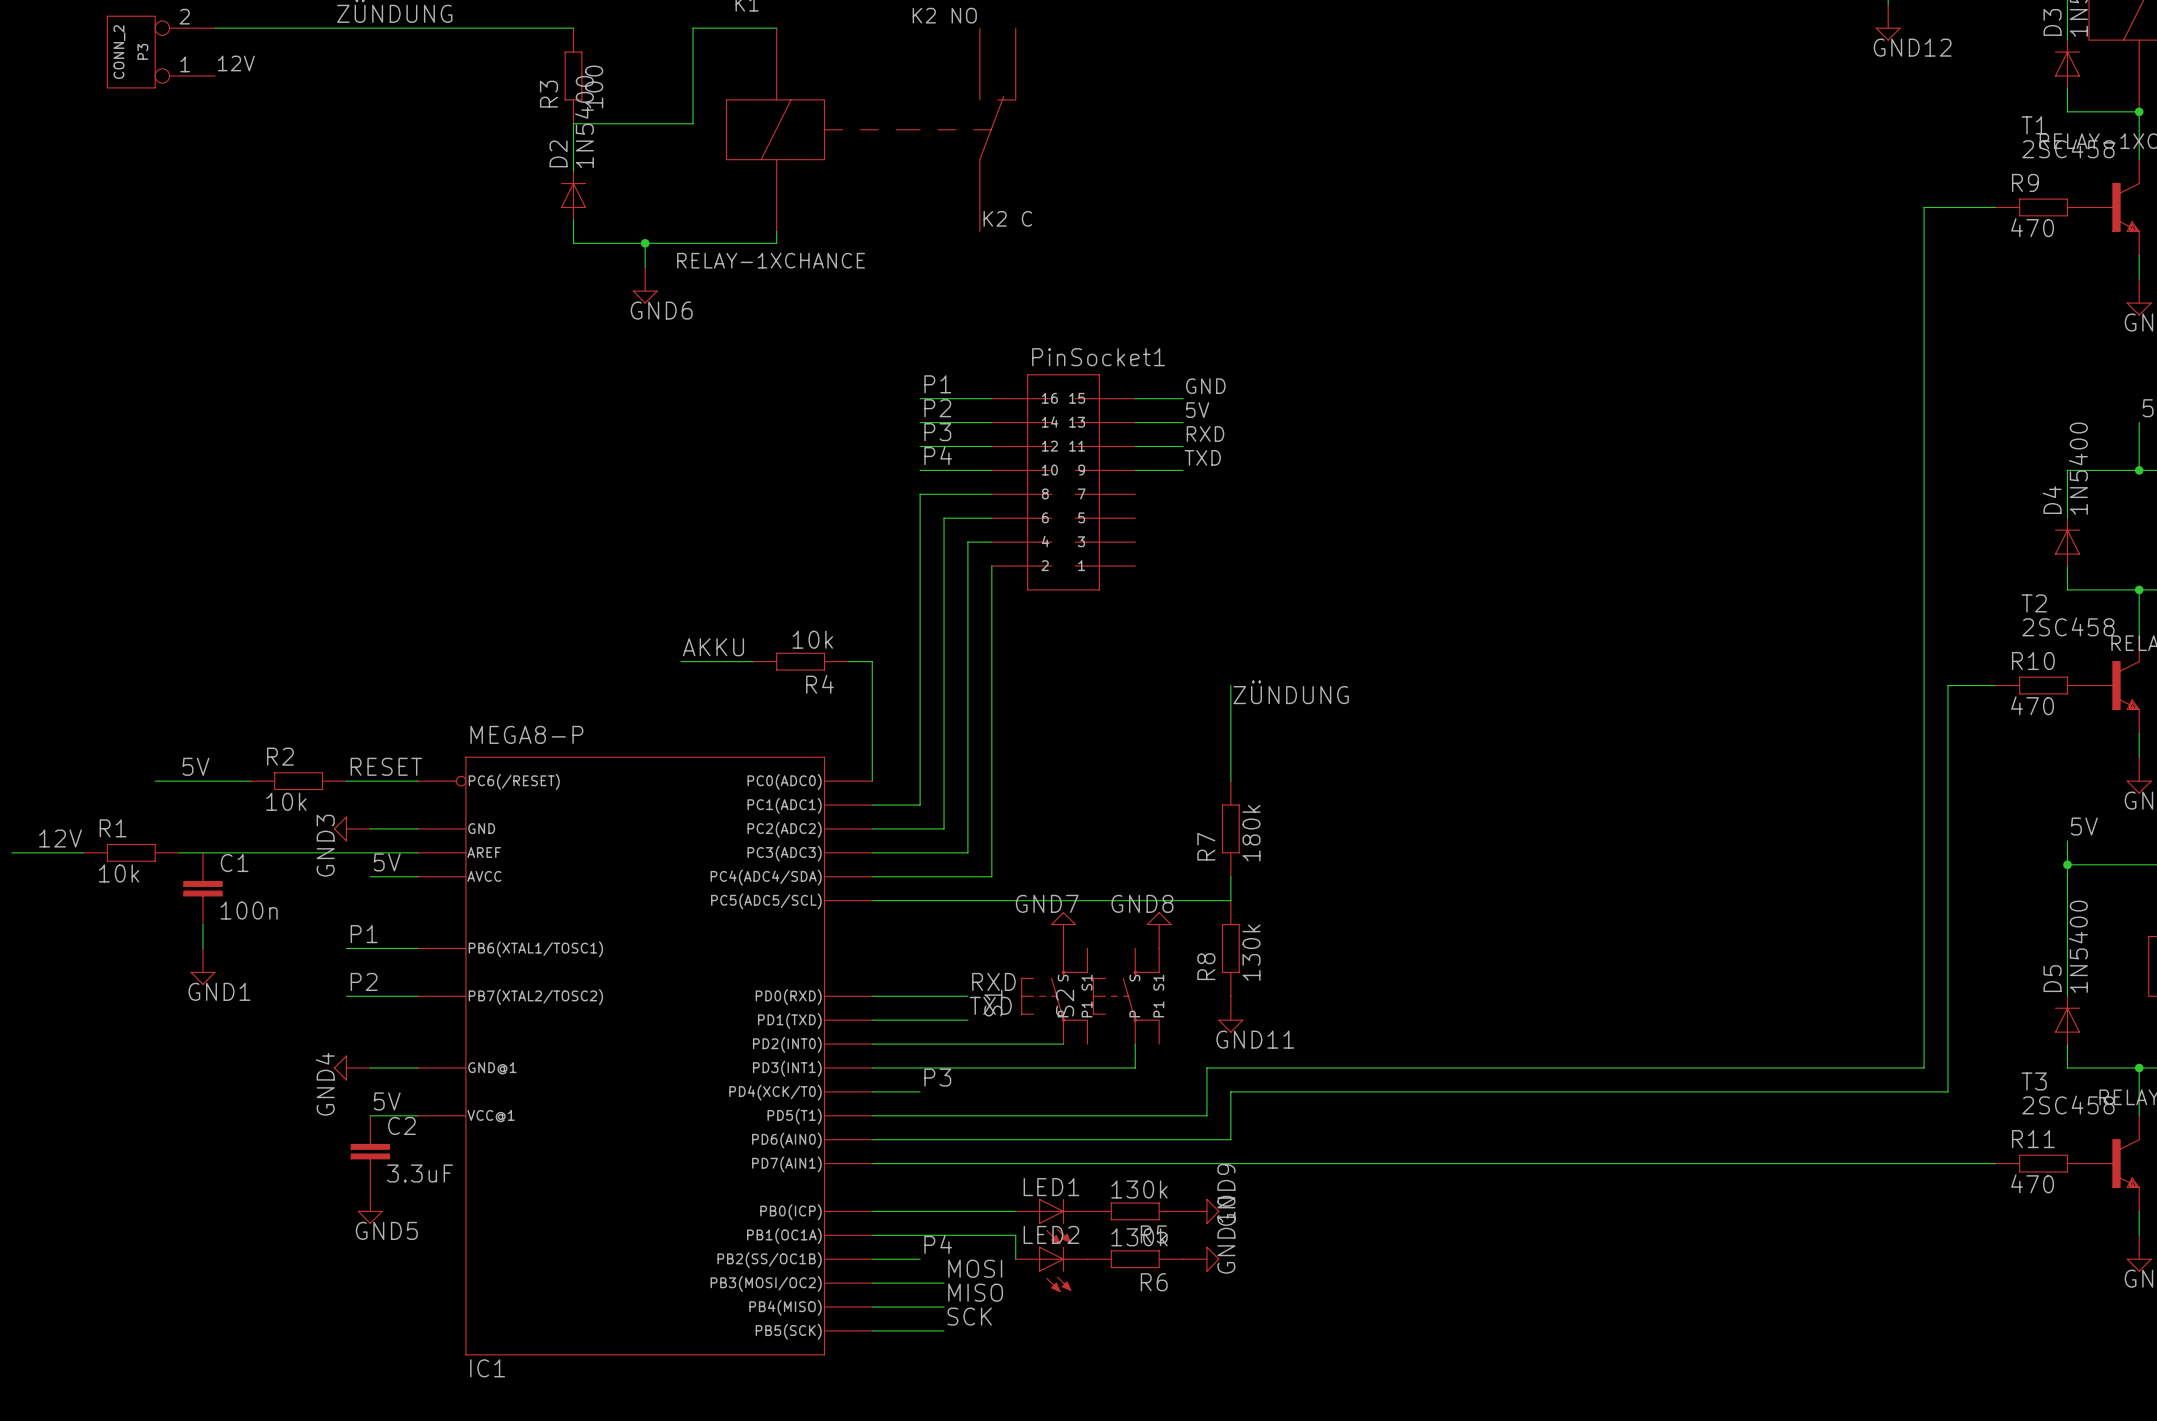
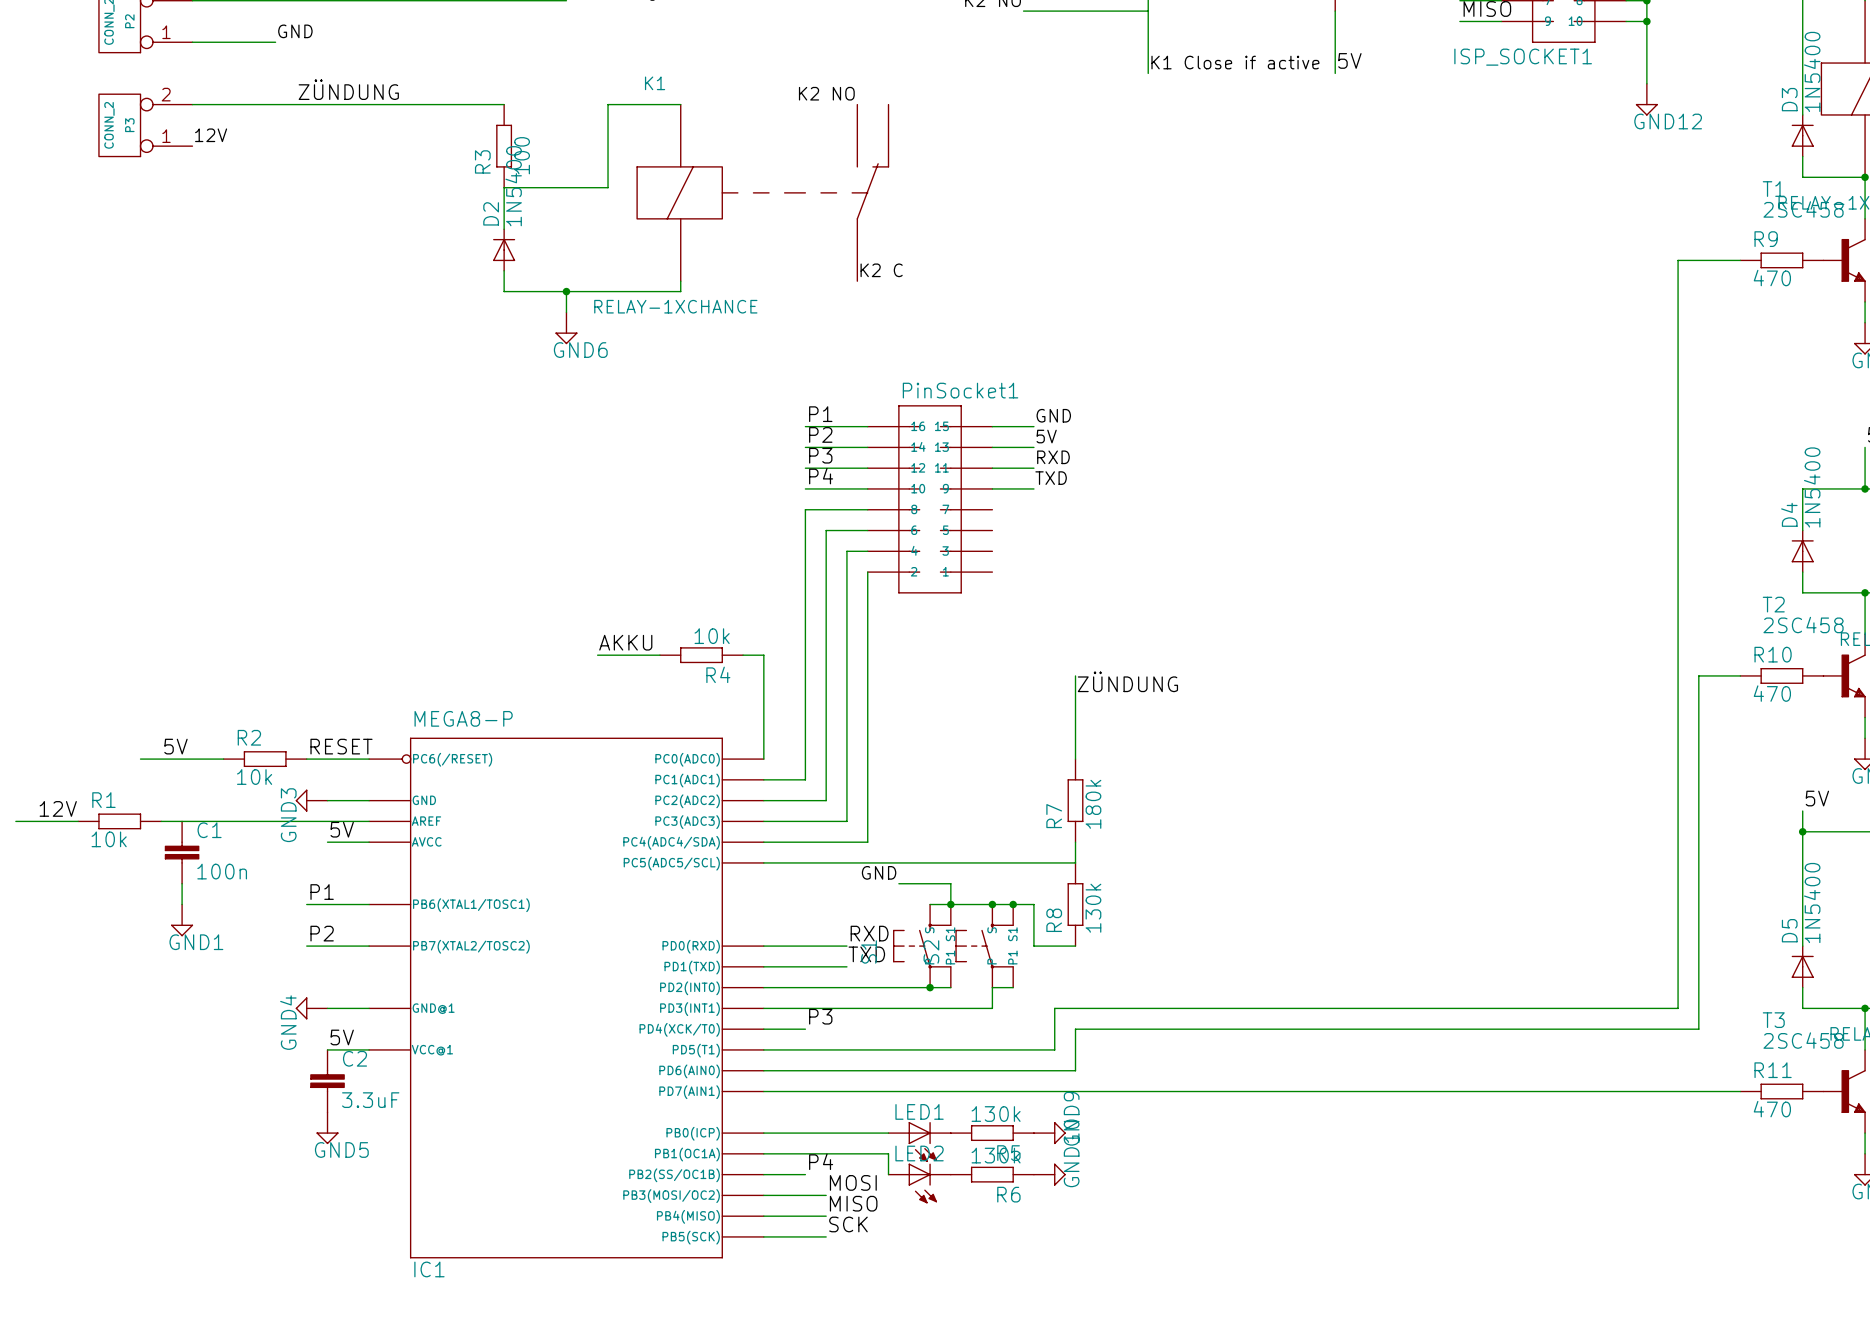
label: none -> GND (879, 872)
wire: none -> (898, 883) (950, 883) (950, 904)
GND7: (1063, 930) -> none
GND8: (1159, 930) -> none
wire: none -> (930, 904) (1033, 904) (1033, 946) (1075, 946)
junction: none -> (950, 904)
junction: none -> (992, 904)
junction: none -> (1013, 904)
GND11: (1230, 1014) -> none
wire: none -> (930, 987) (950, 987)
junction: none -> (930, 987)
wire: none -> (992, 987) (1013, 987)

